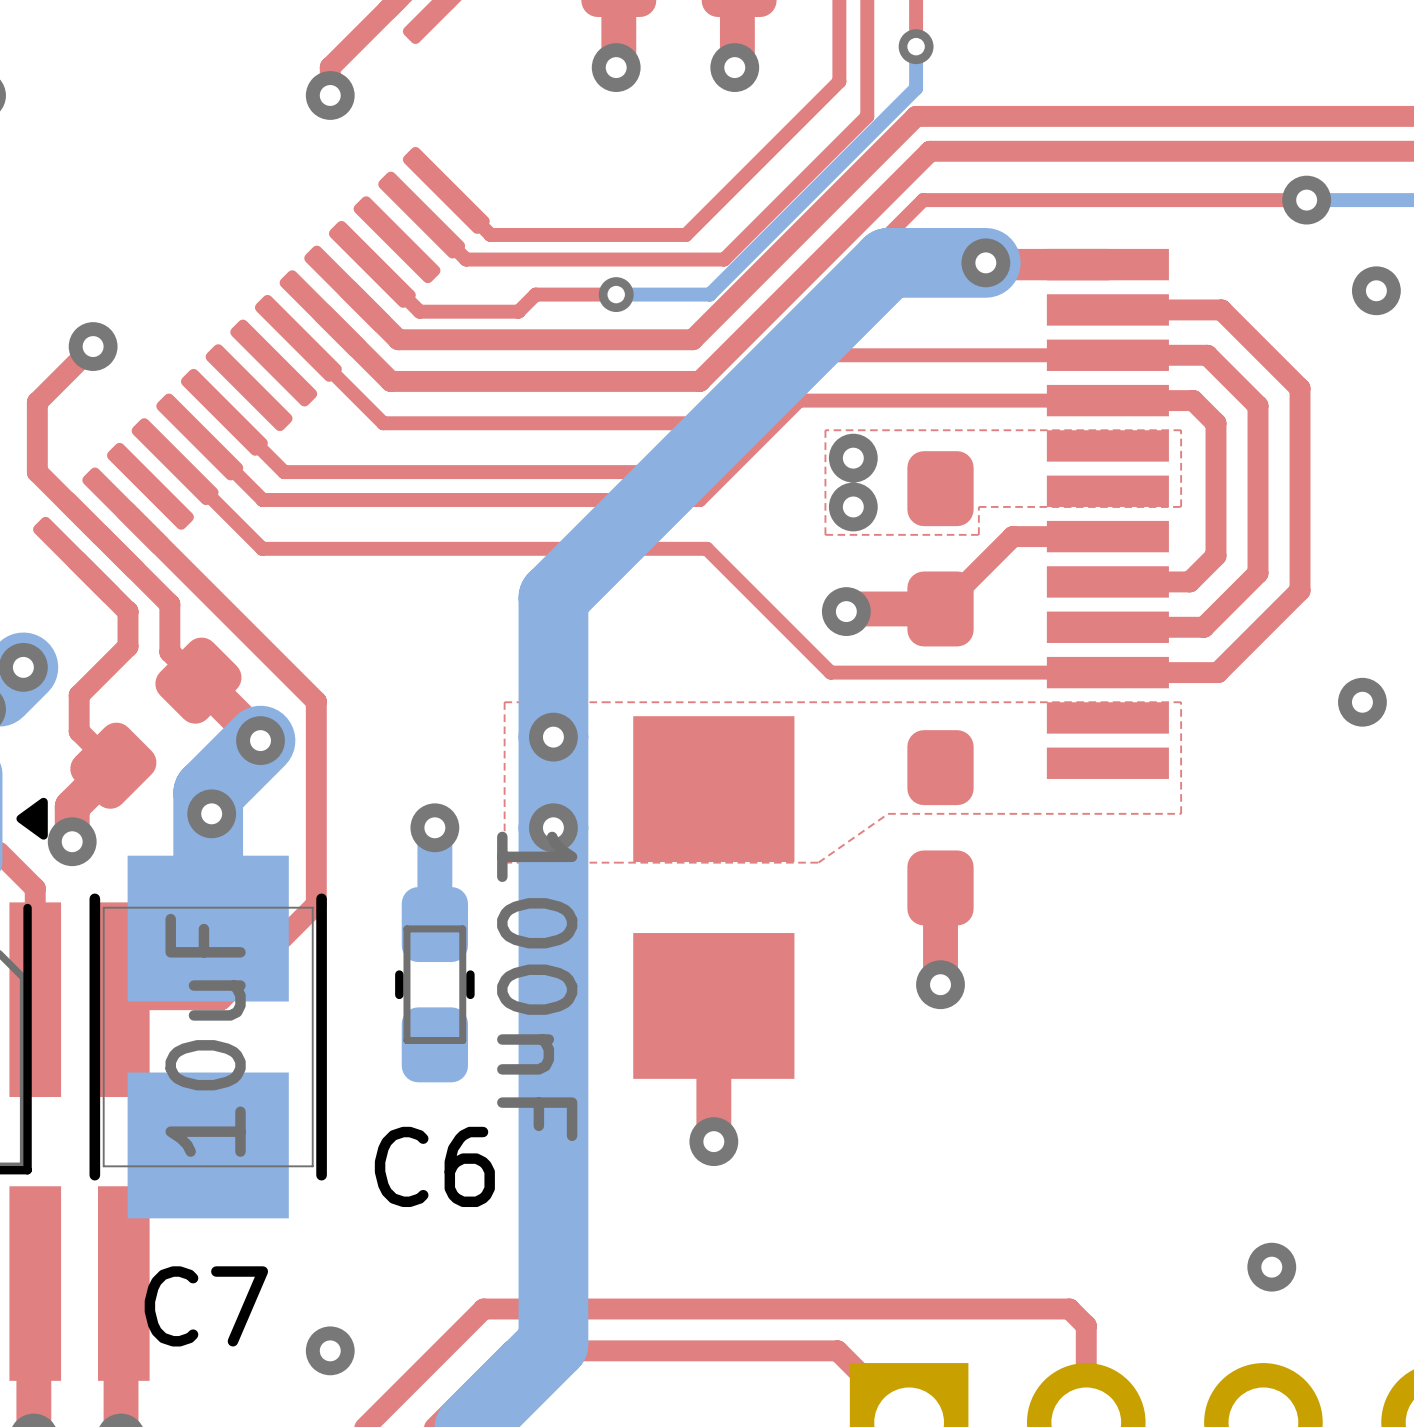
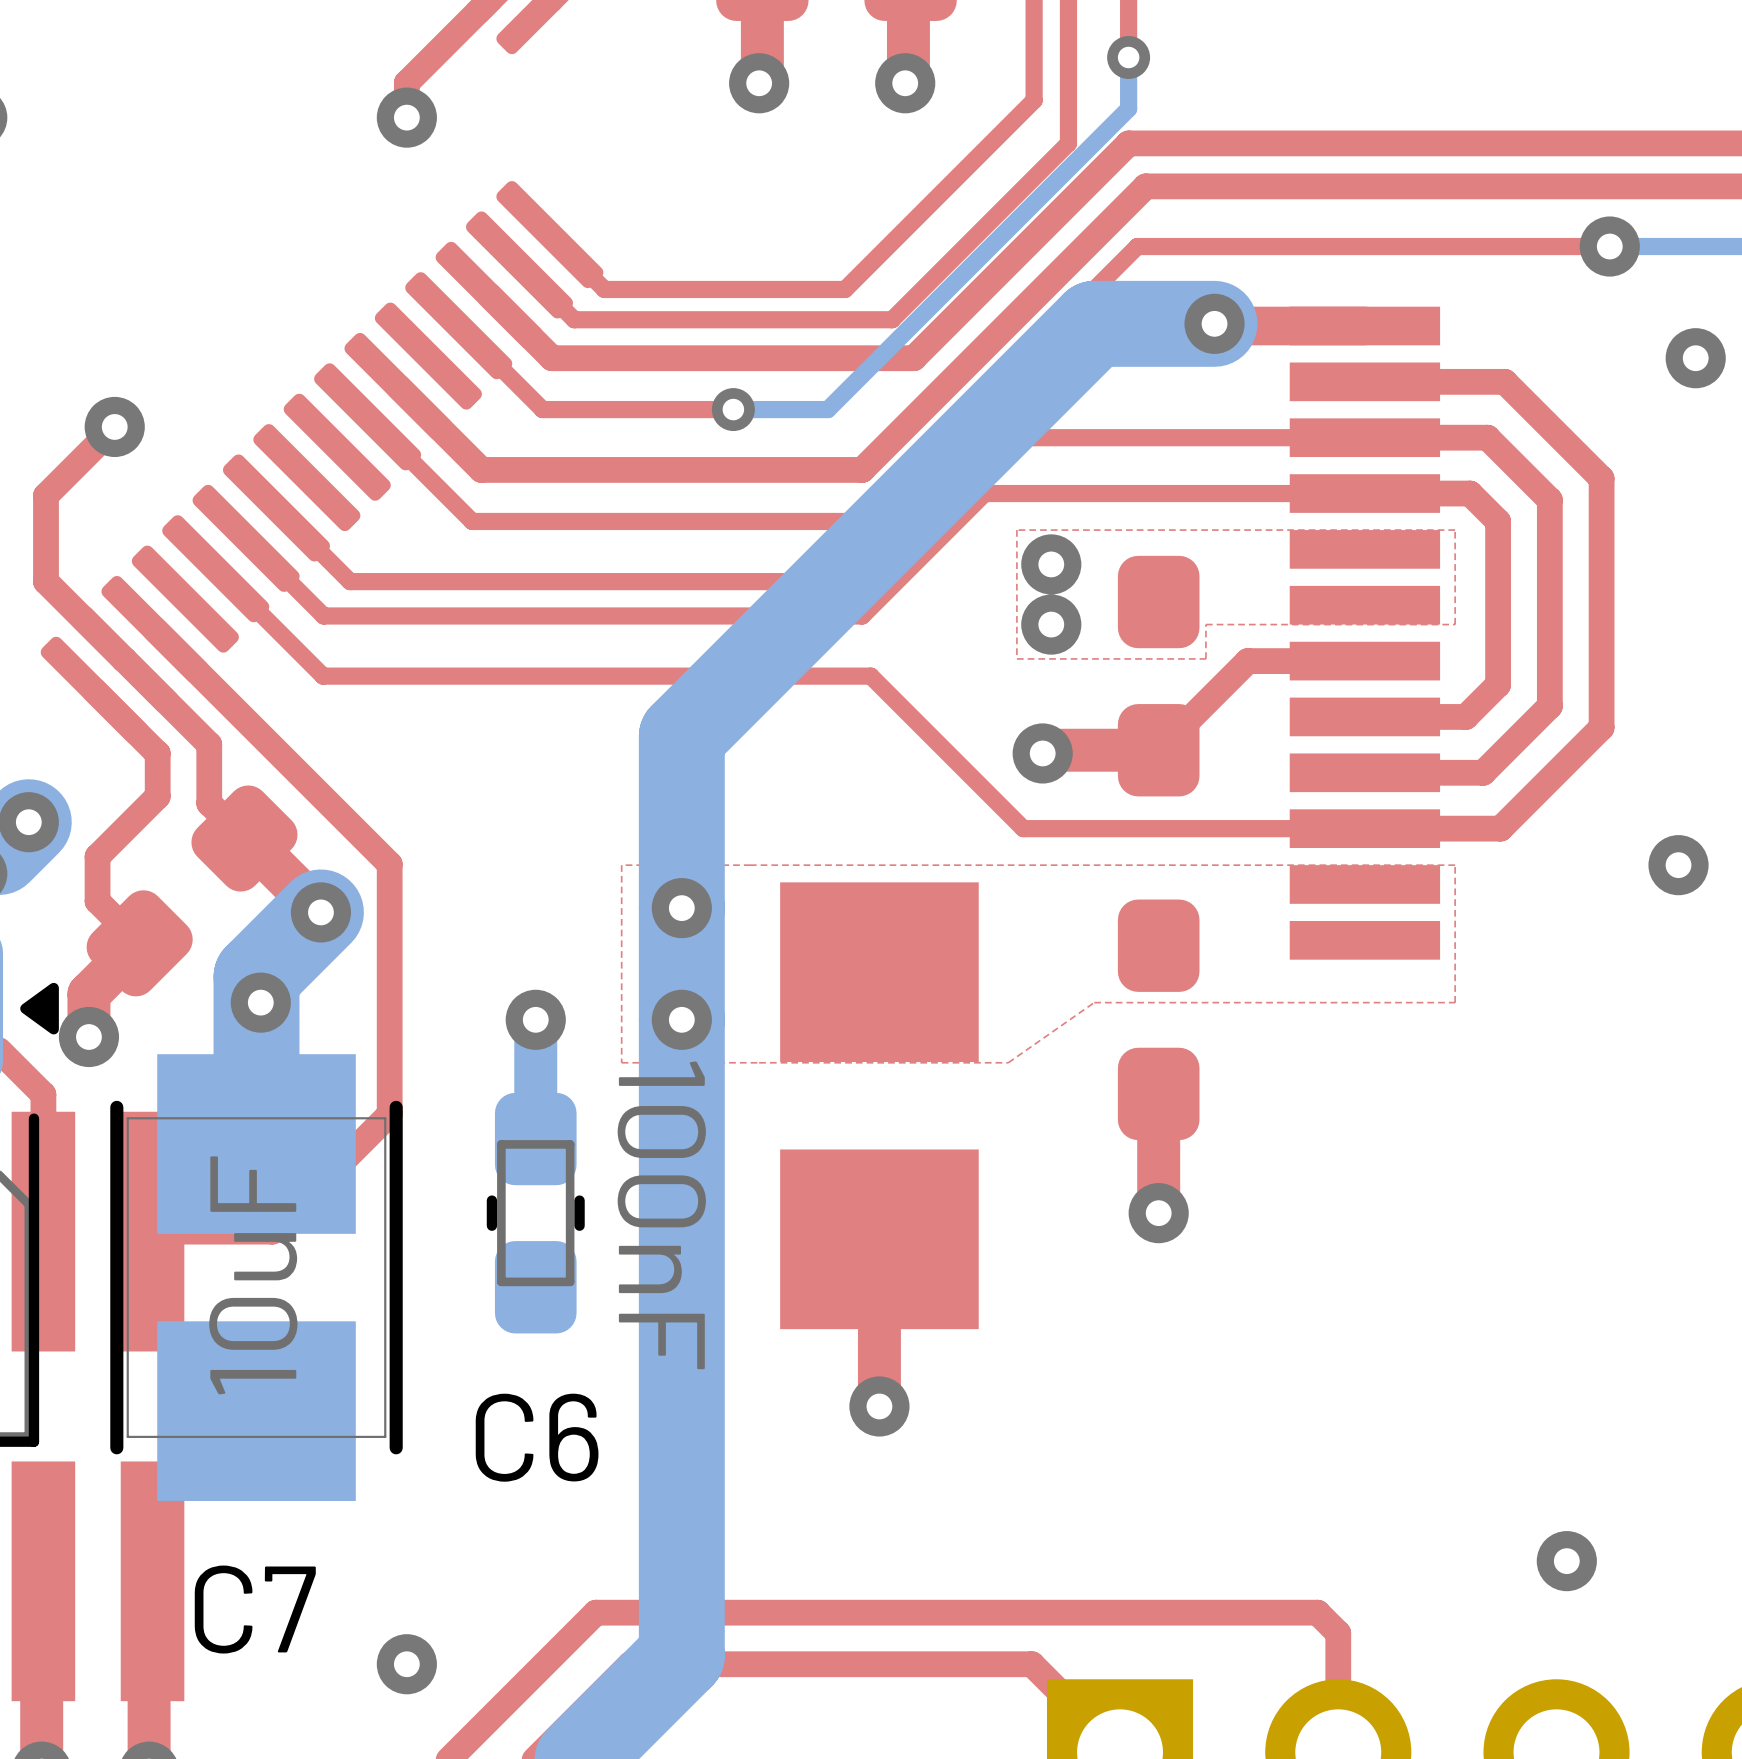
top track: (347, 289) (398, 339) (692, 339) (741, 290) -> (489, 295) (552, 358) (913, 358)
top track: (616, 294) (535, 294) (518, 311) (419, 311) -> (733, 409) (542, 409) (517, 383)
via position: (616, 294) -> (733, 409)
bottom track: (709, 294) (616, 294) -> (874, 362) (827, 409) (733, 409)

